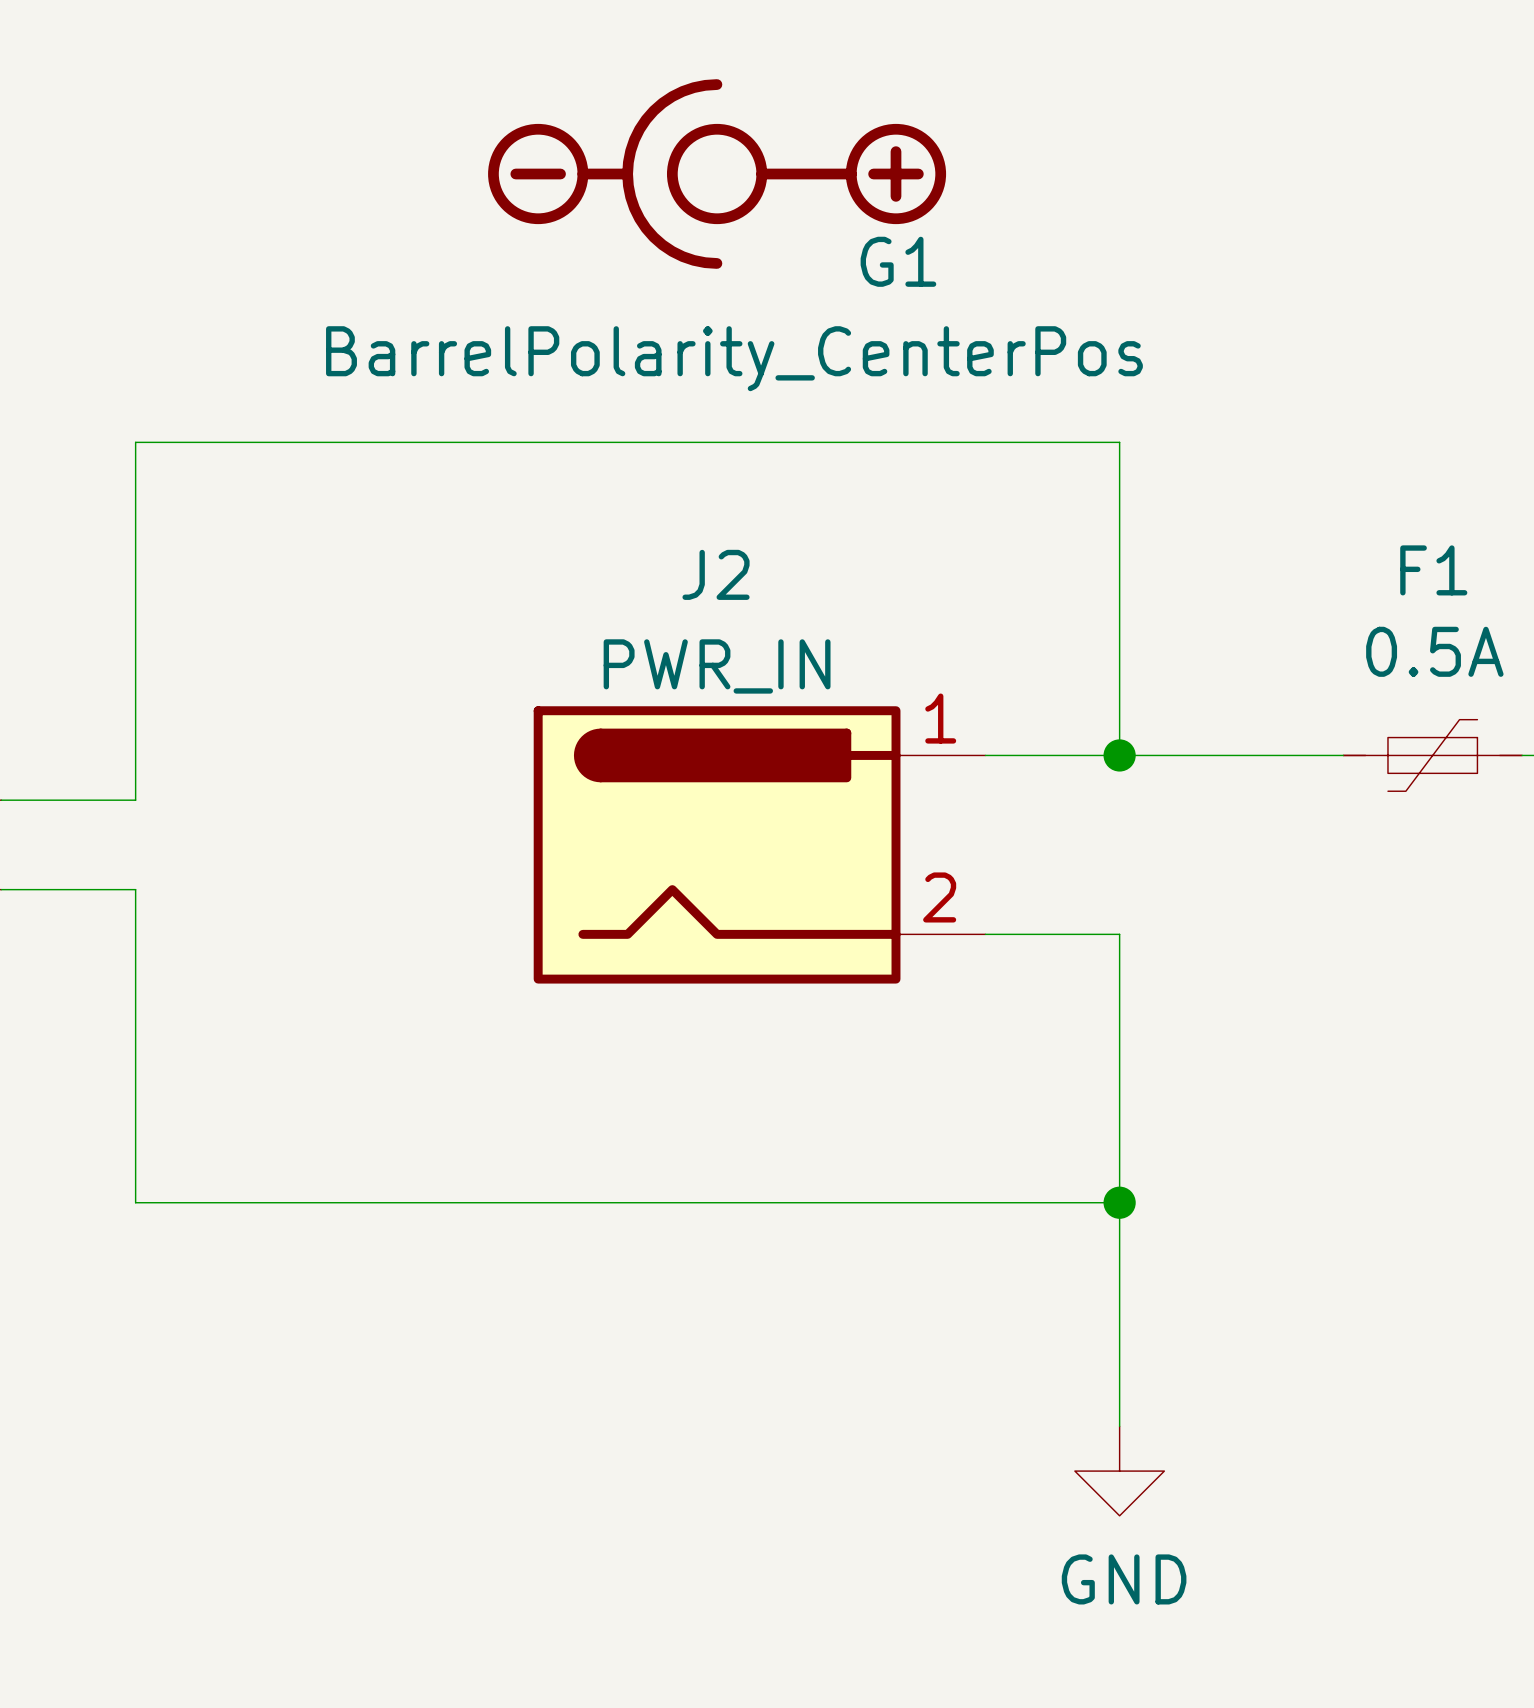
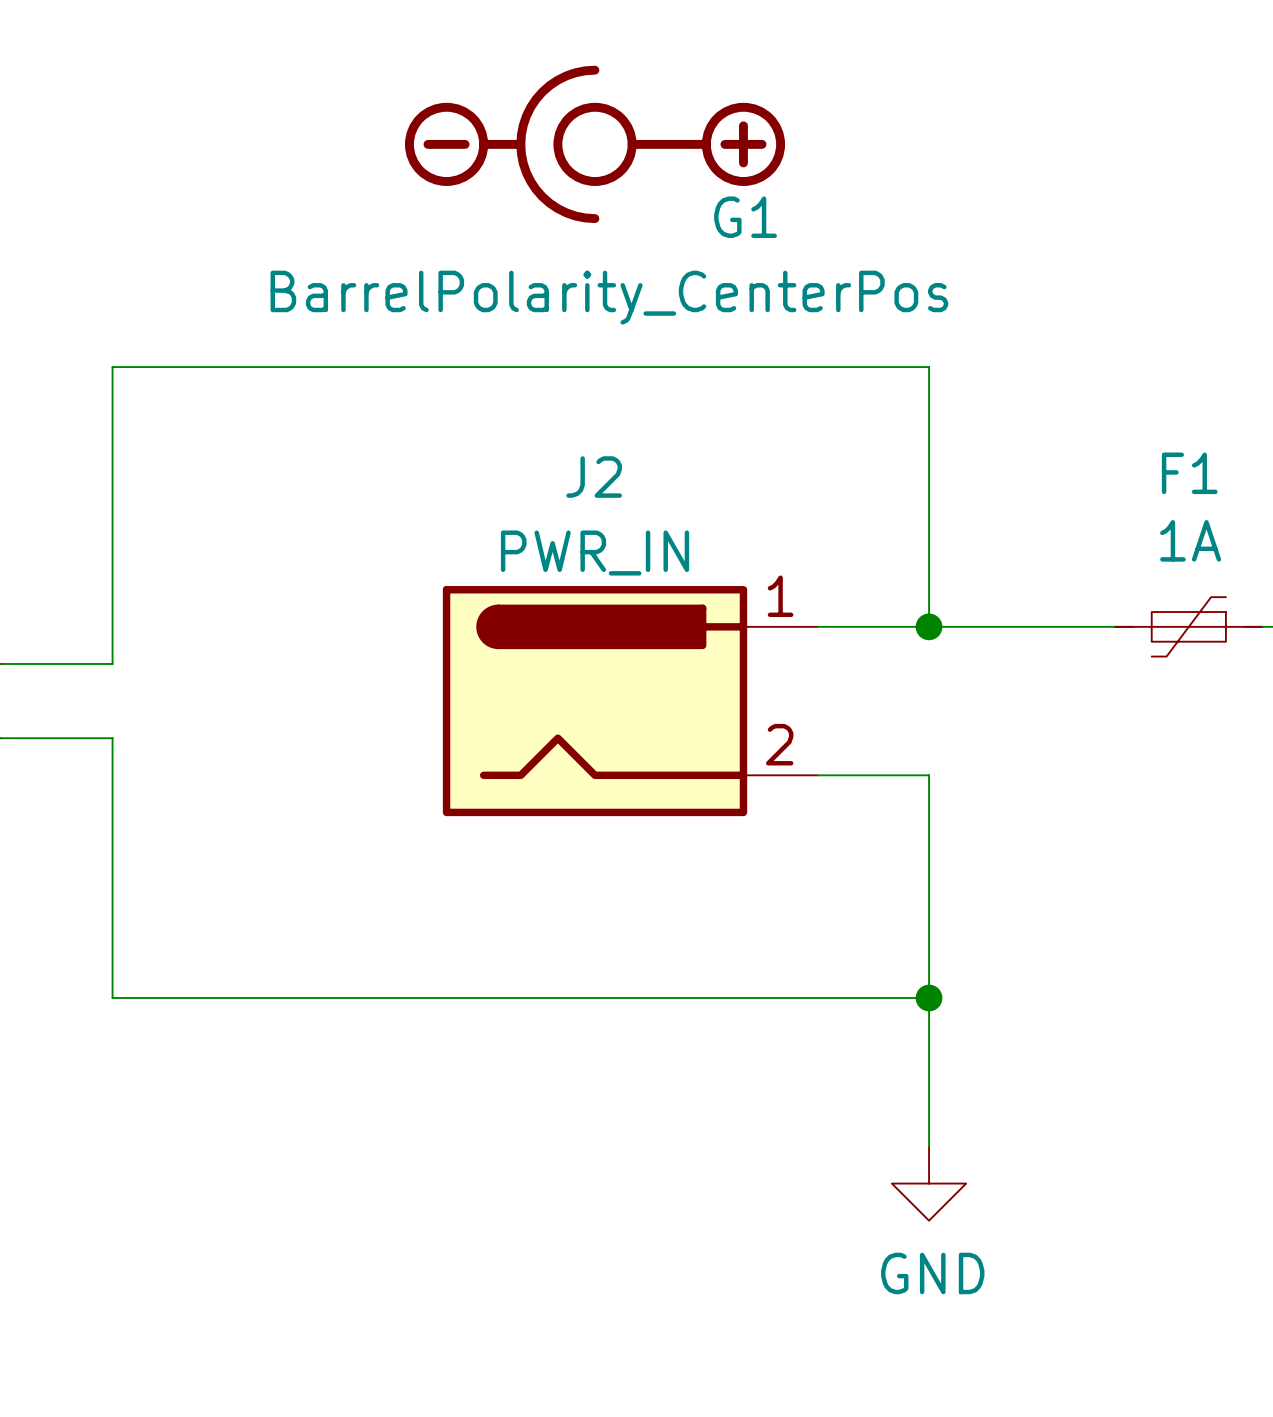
F1 value: 0.5A (1434, 651) -> 1A (1190, 540)
power symbol position: GND (1119, 1471) -> GND (929, 1183)

